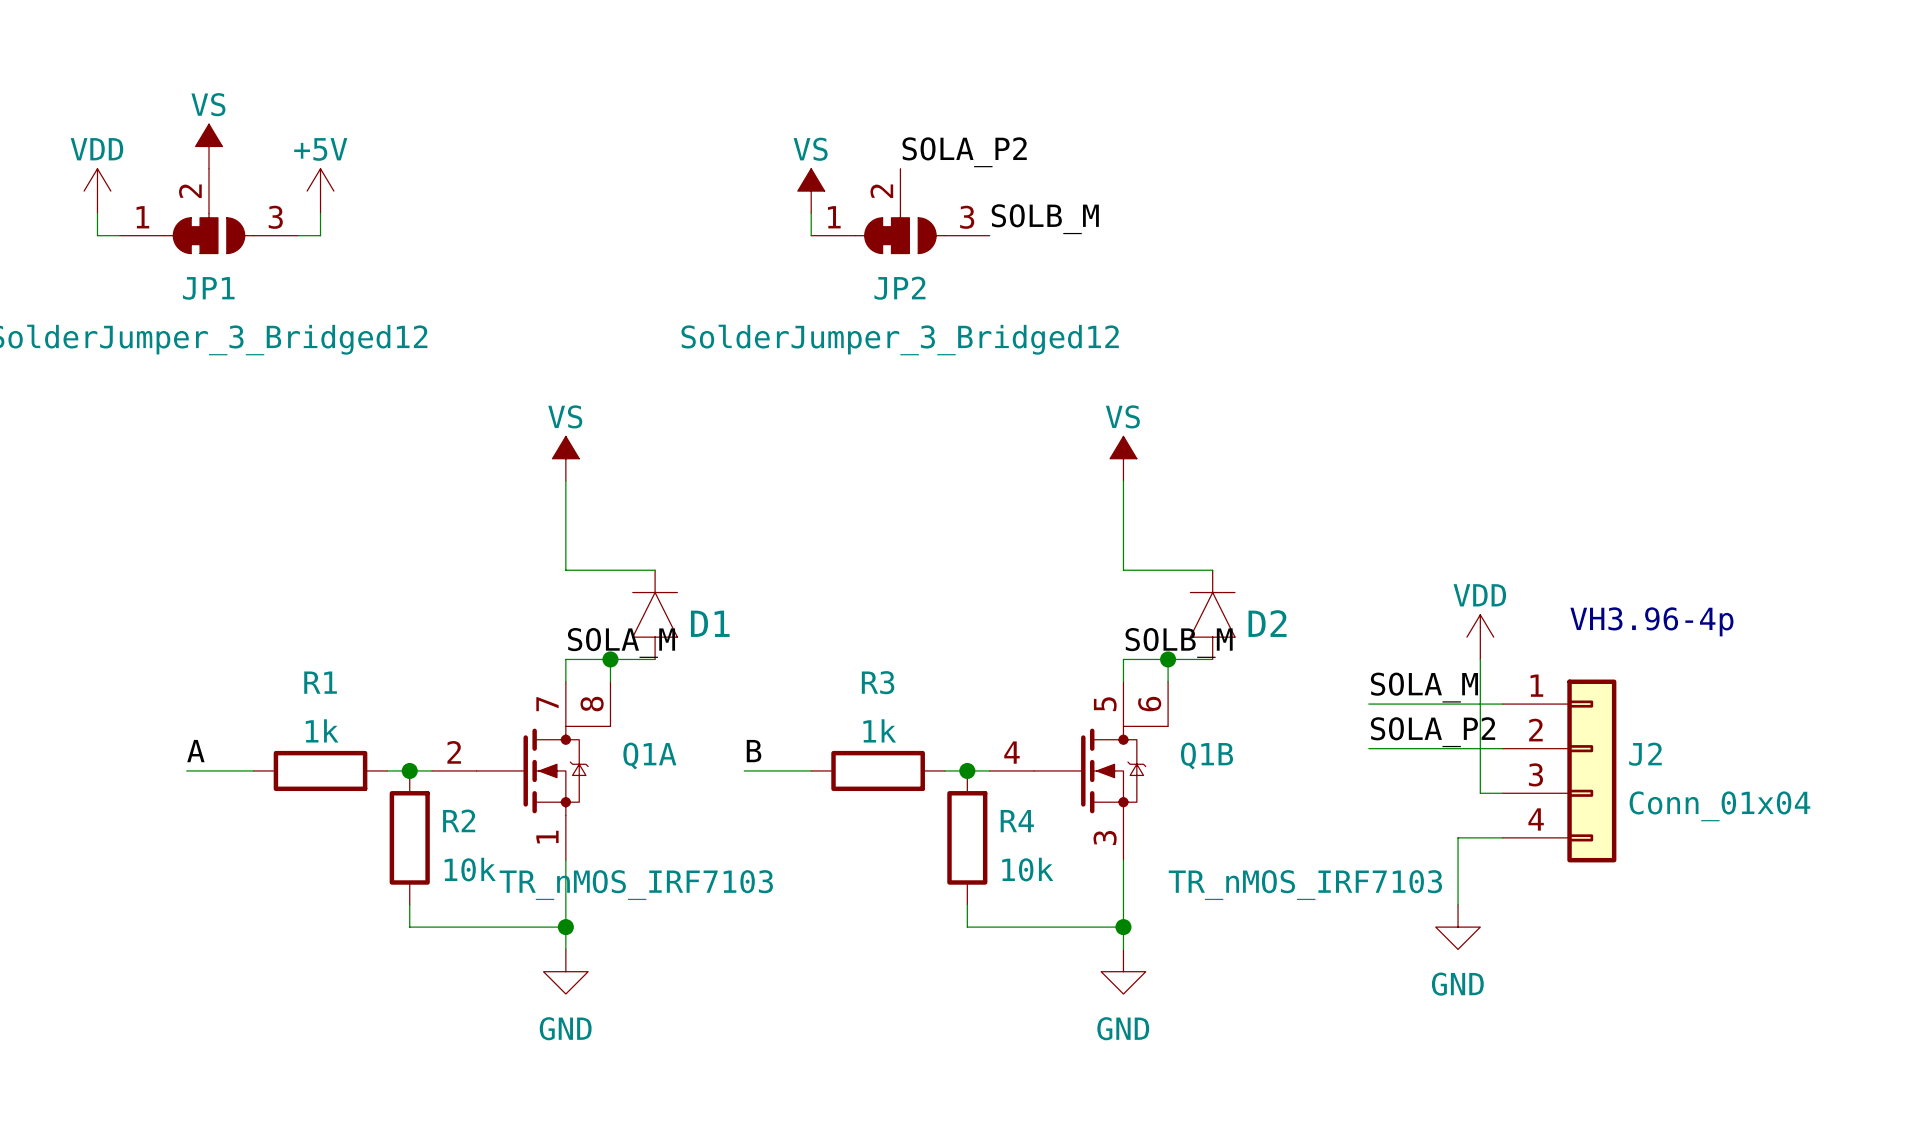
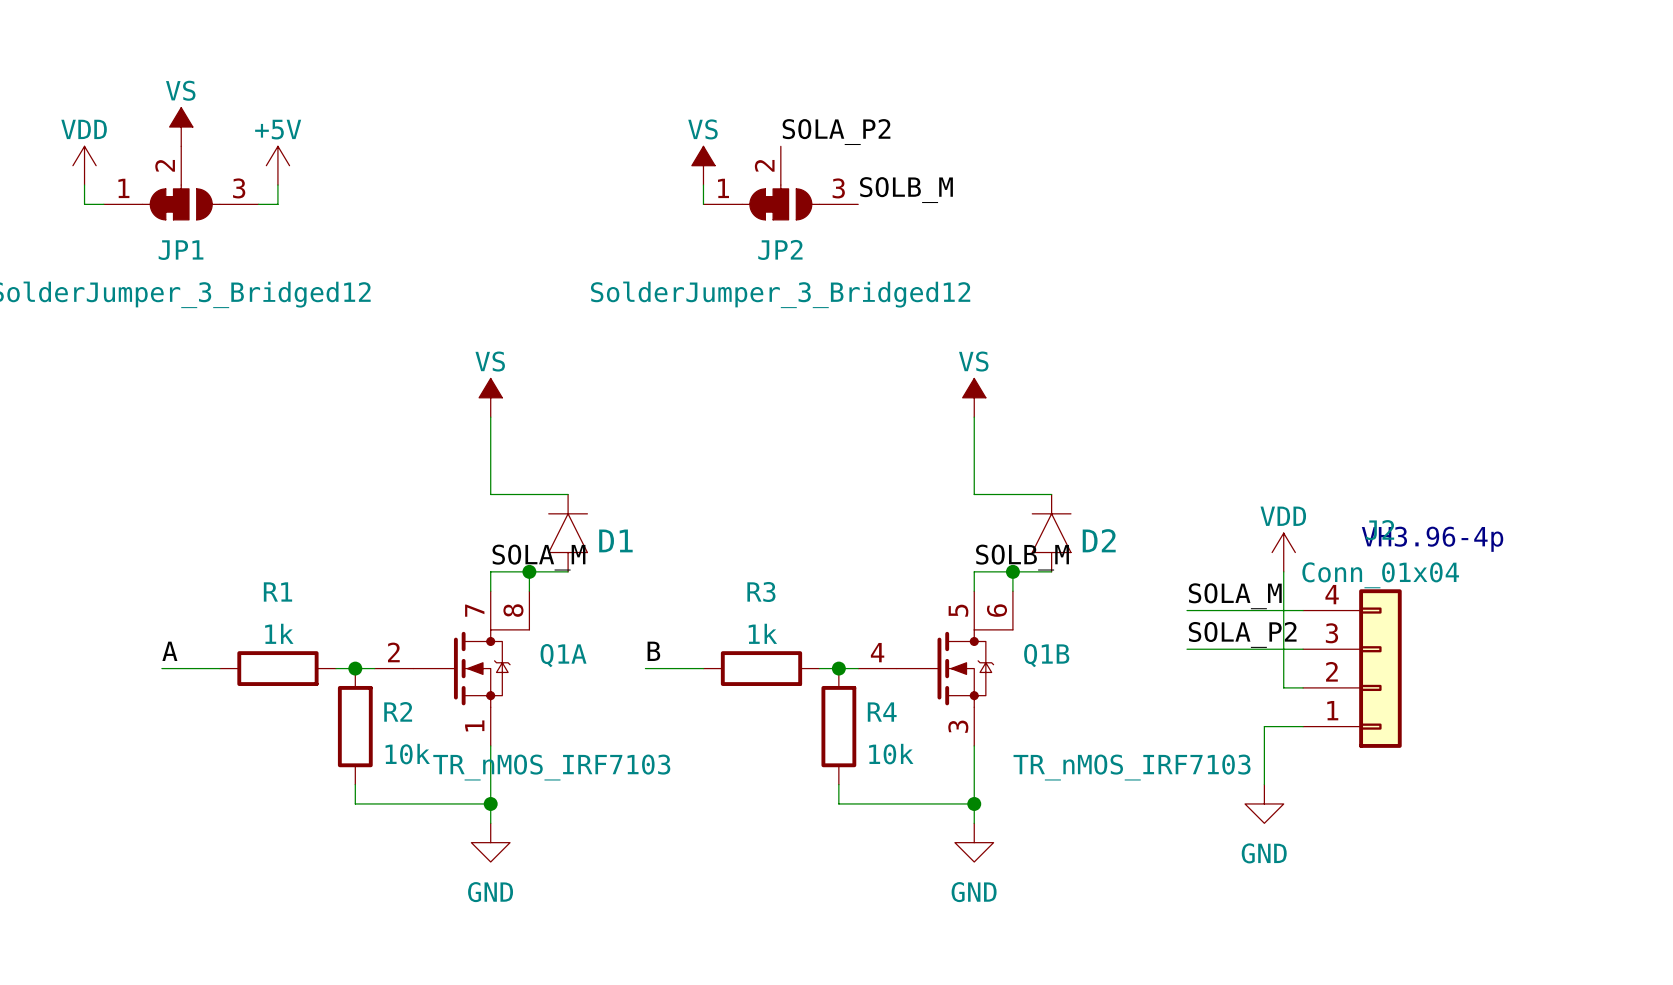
J2 name position: J2 (1645, 754) -> J2 (1380, 530)
J2 flip: as is (1591, 770) -> up-down (1380, 668)
J2 value position: Conn_01x04 (1719, 806) -> Conn_01x04 (1380, 575)

